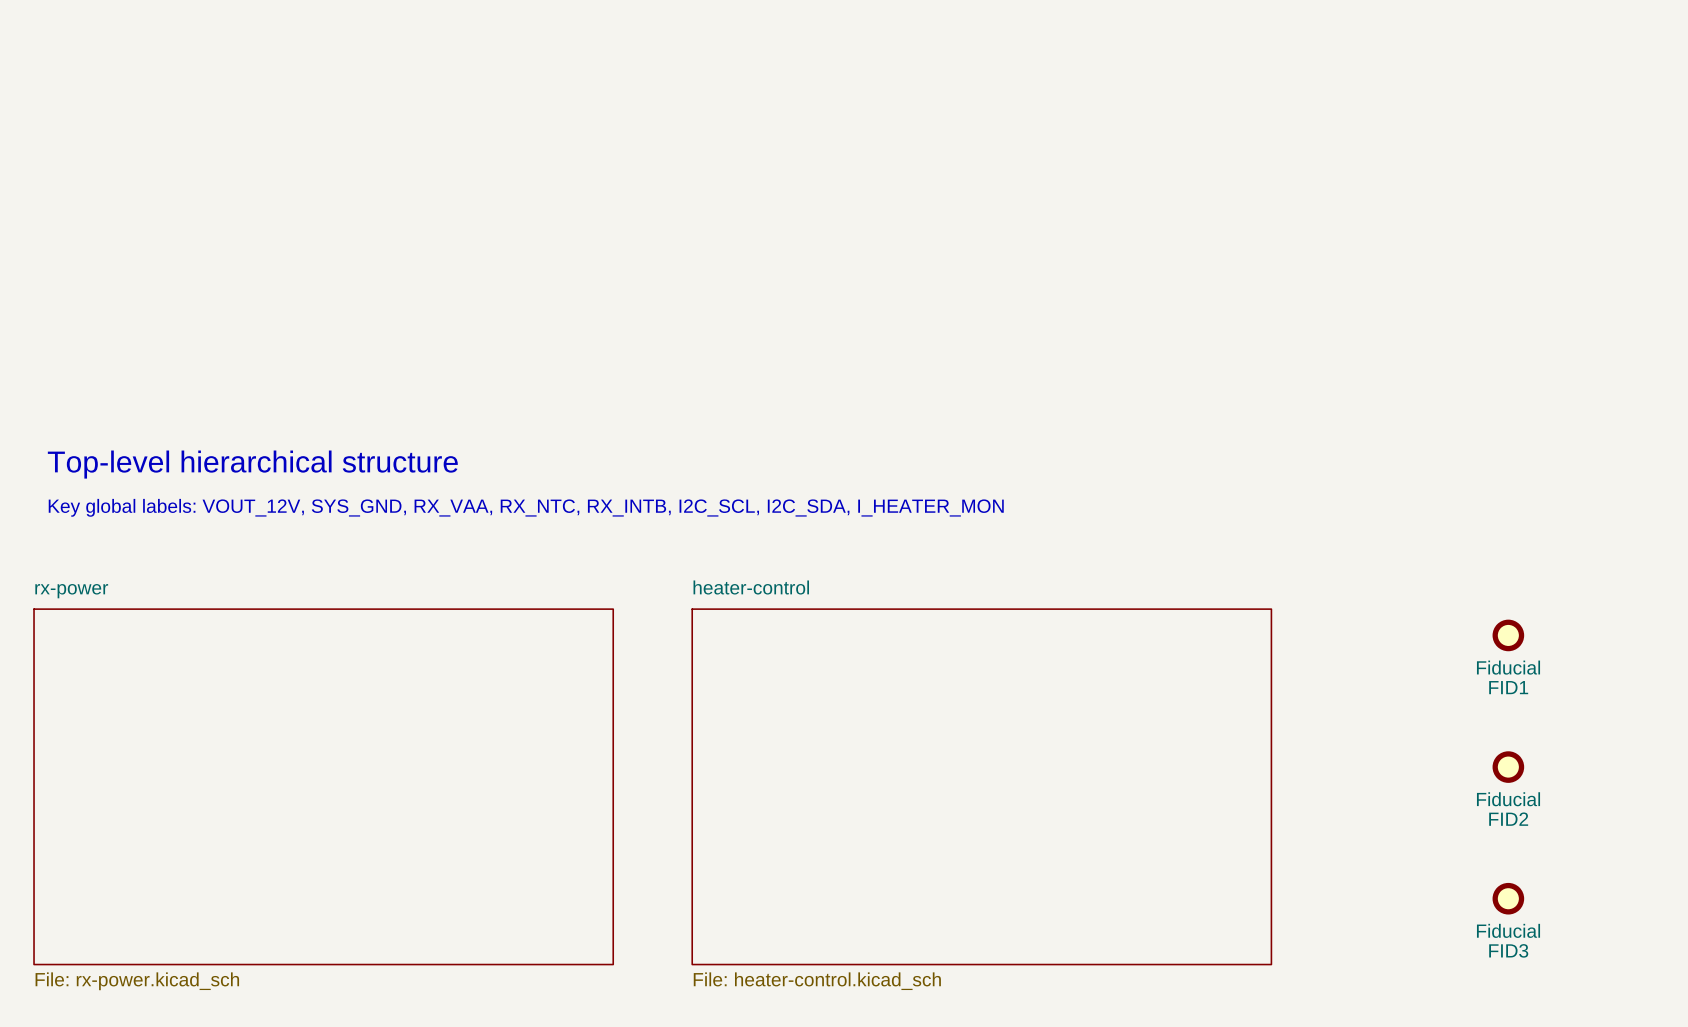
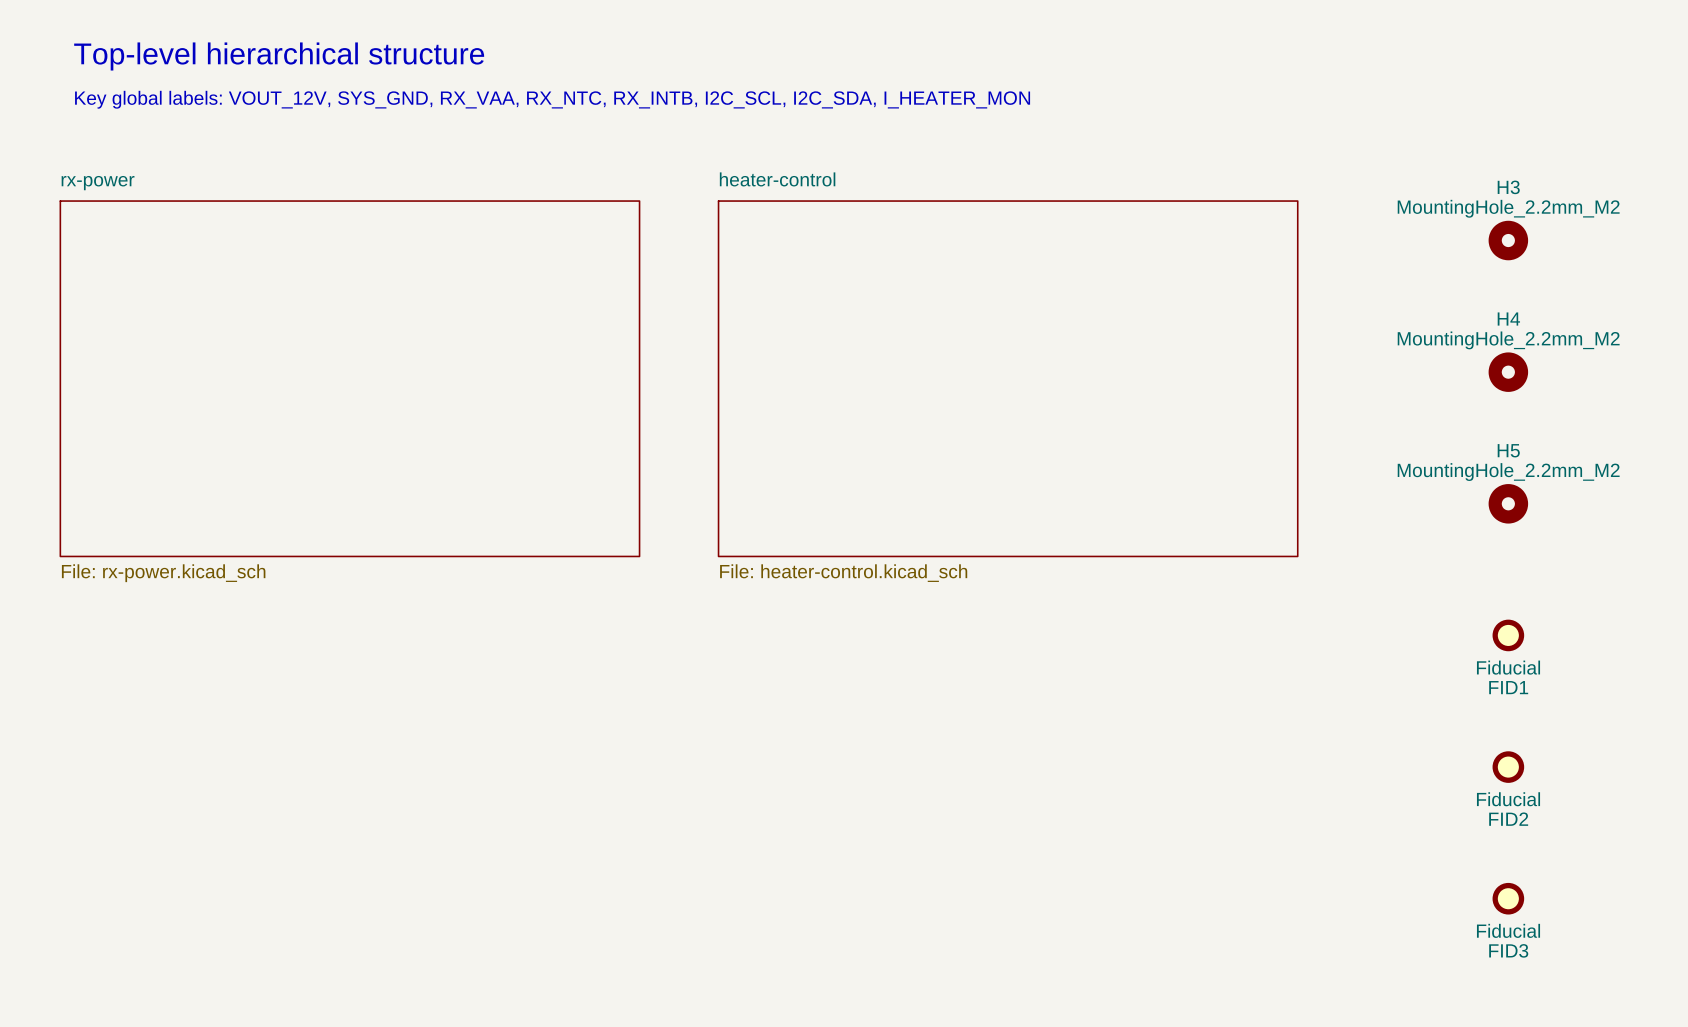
text: none -> Top-level hierarchical structure (279, 56)
text: none -> Key global labels: VOUT_12V, SYS_GND, RX_VAA, RX_NTC, RX_INTB, I2C_SCL, I2C_SDA, I_HEATER_MON (552, 99)
H3: none -> MountingHole_2.2mm_M2 (1508, 240)
H4: none -> MountingHole_2.2mm_M2 (1508, 372)
sheet rx-power: none -> File: rx-power.kicad_sch (349, 378)
sheet heater-control: none -> File: heater-control.kicad_sch (1008, 378)
text: Top-level hierarchical structure (252, 464) -> none
H5: none -> MountingHole_2.2mm_M2 (1508, 503)
text: Key global labels: VOUT_12V, SYS_GND, RX_VAA, RX_NTC, RX_INTB, I2C_SCL, I2C_SDA, I_HEATER_MON (526, 507) -> none
sheet rx-power: File: rx-power.kicad_sch (323, 786) -> none
sheet heater-control: File: heater-control.kicad_sch (981, 786) -> none

